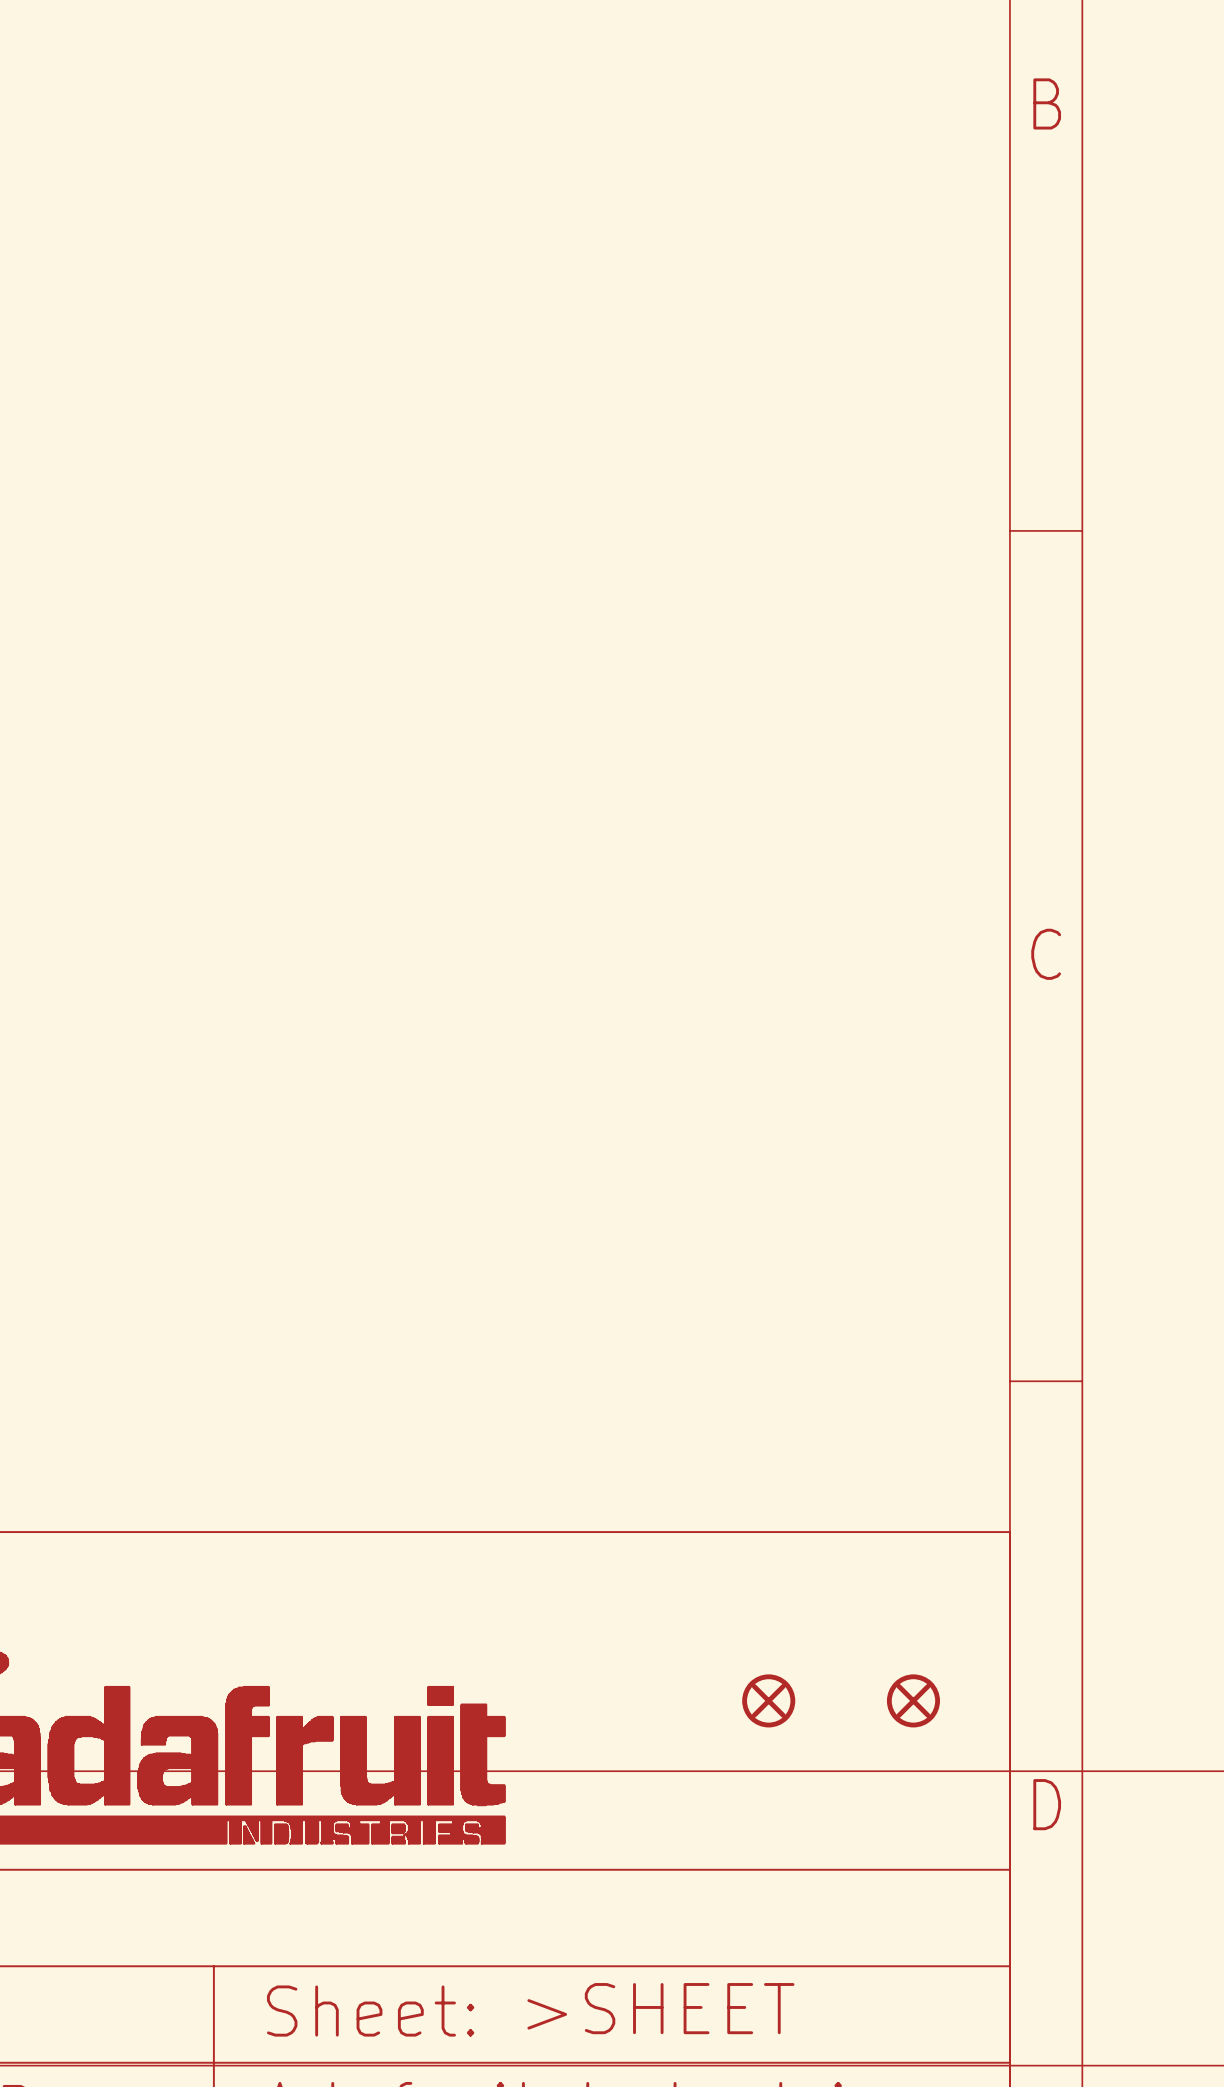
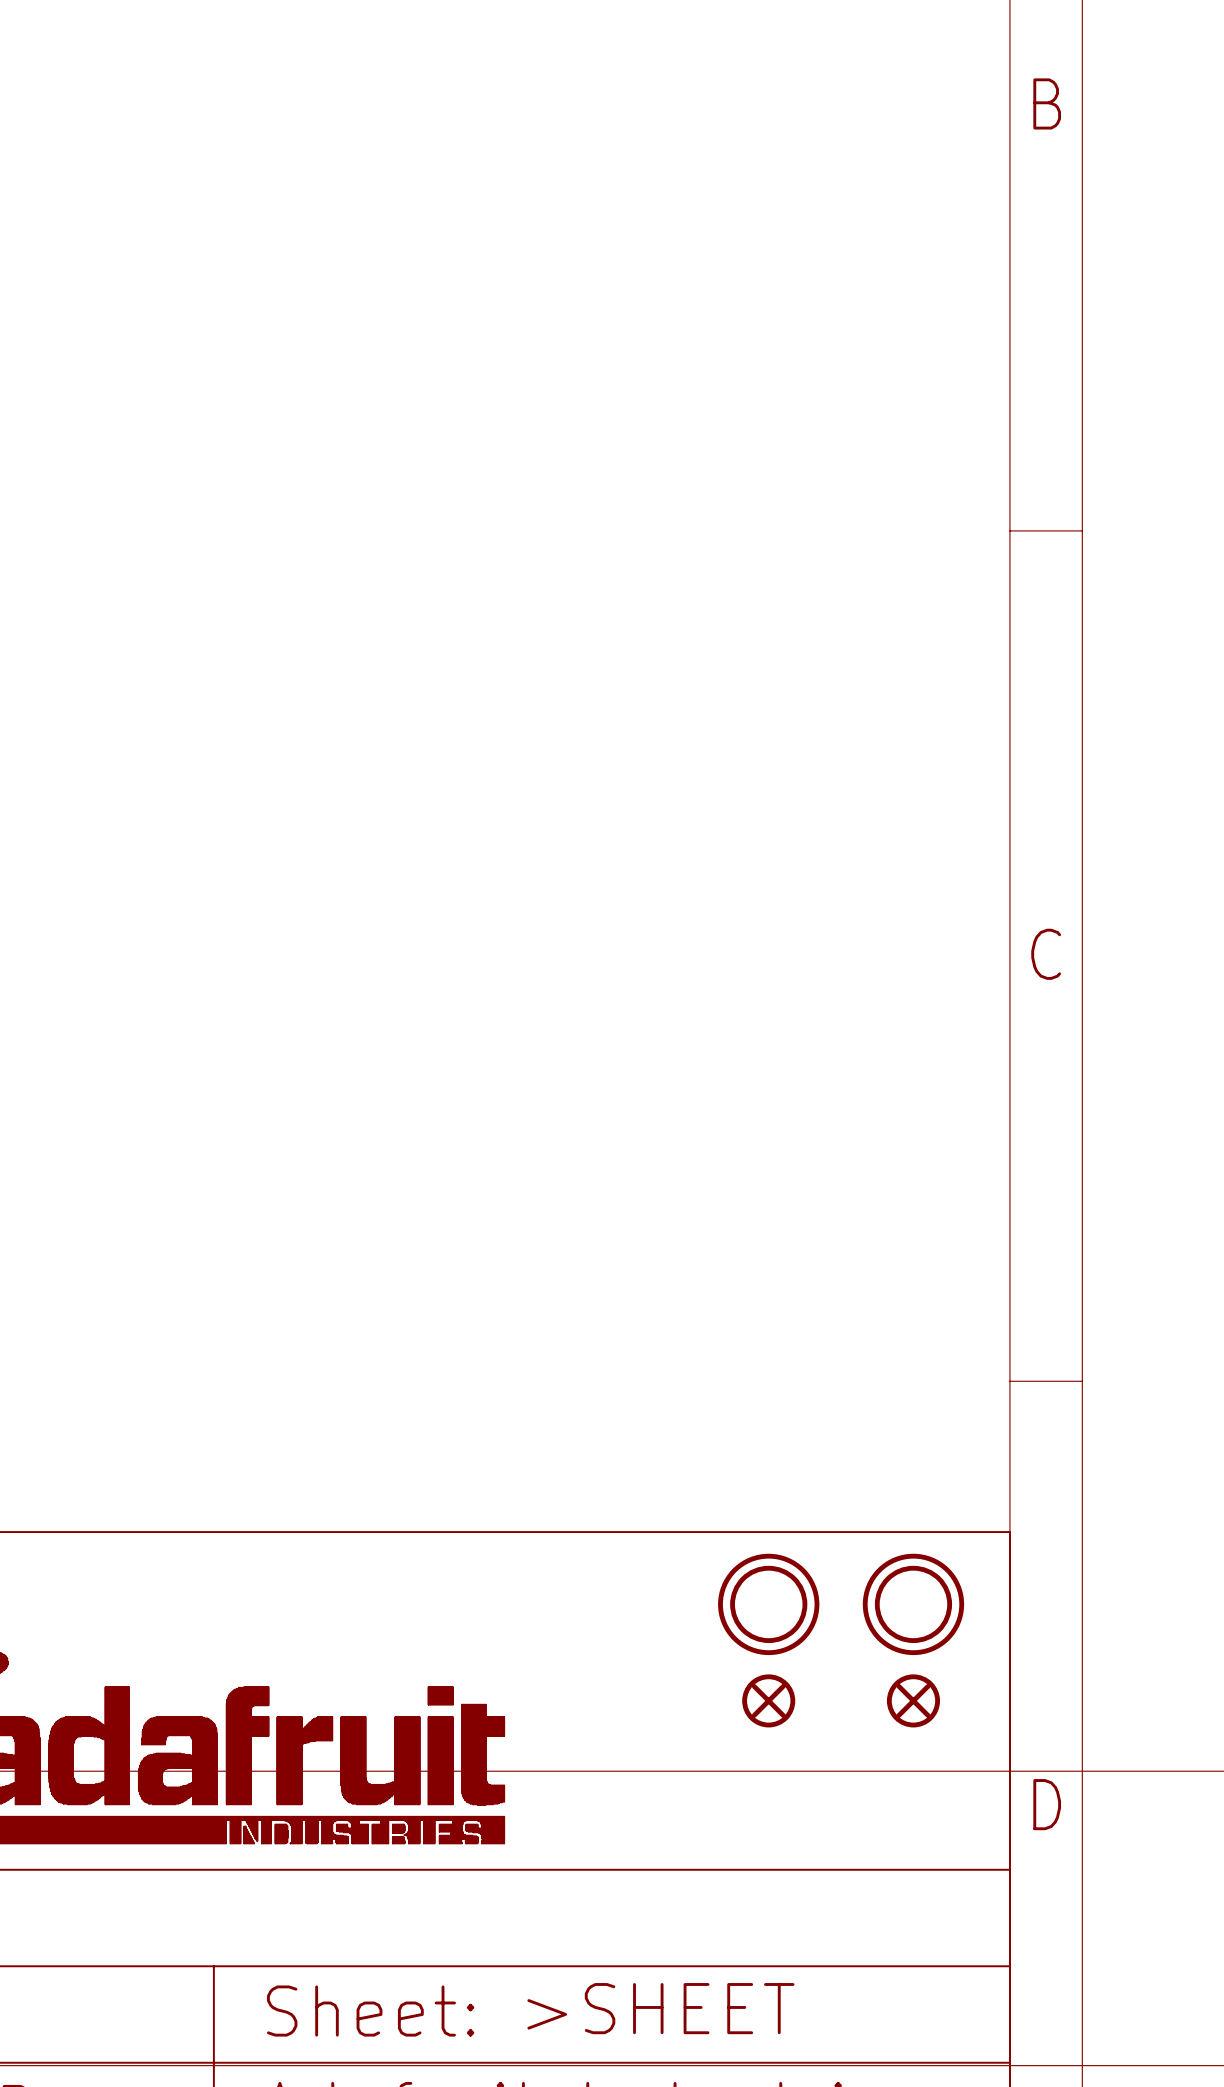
part: none -> (768, 1604)
part: none -> (913, 1604)

